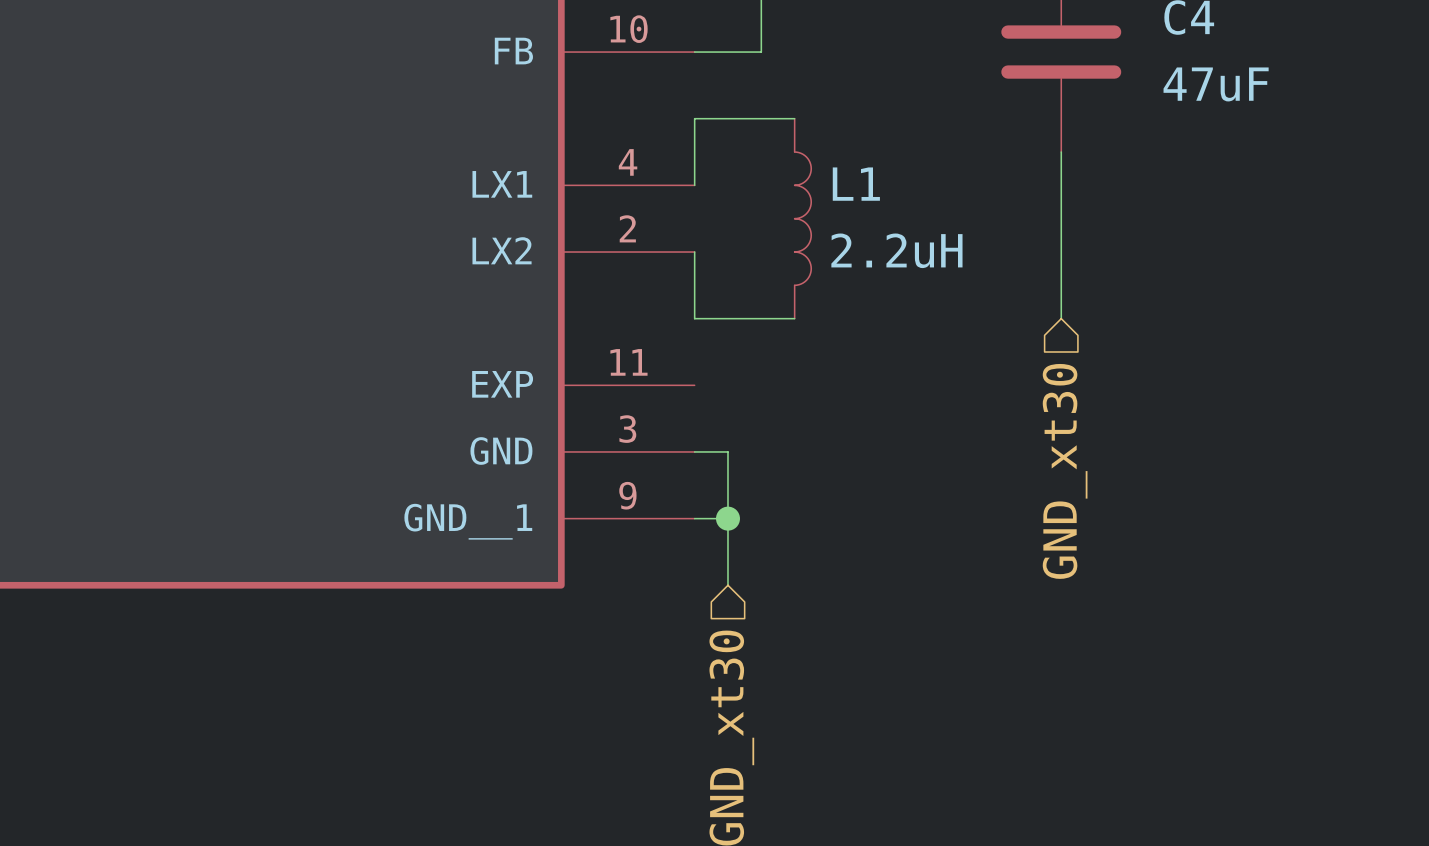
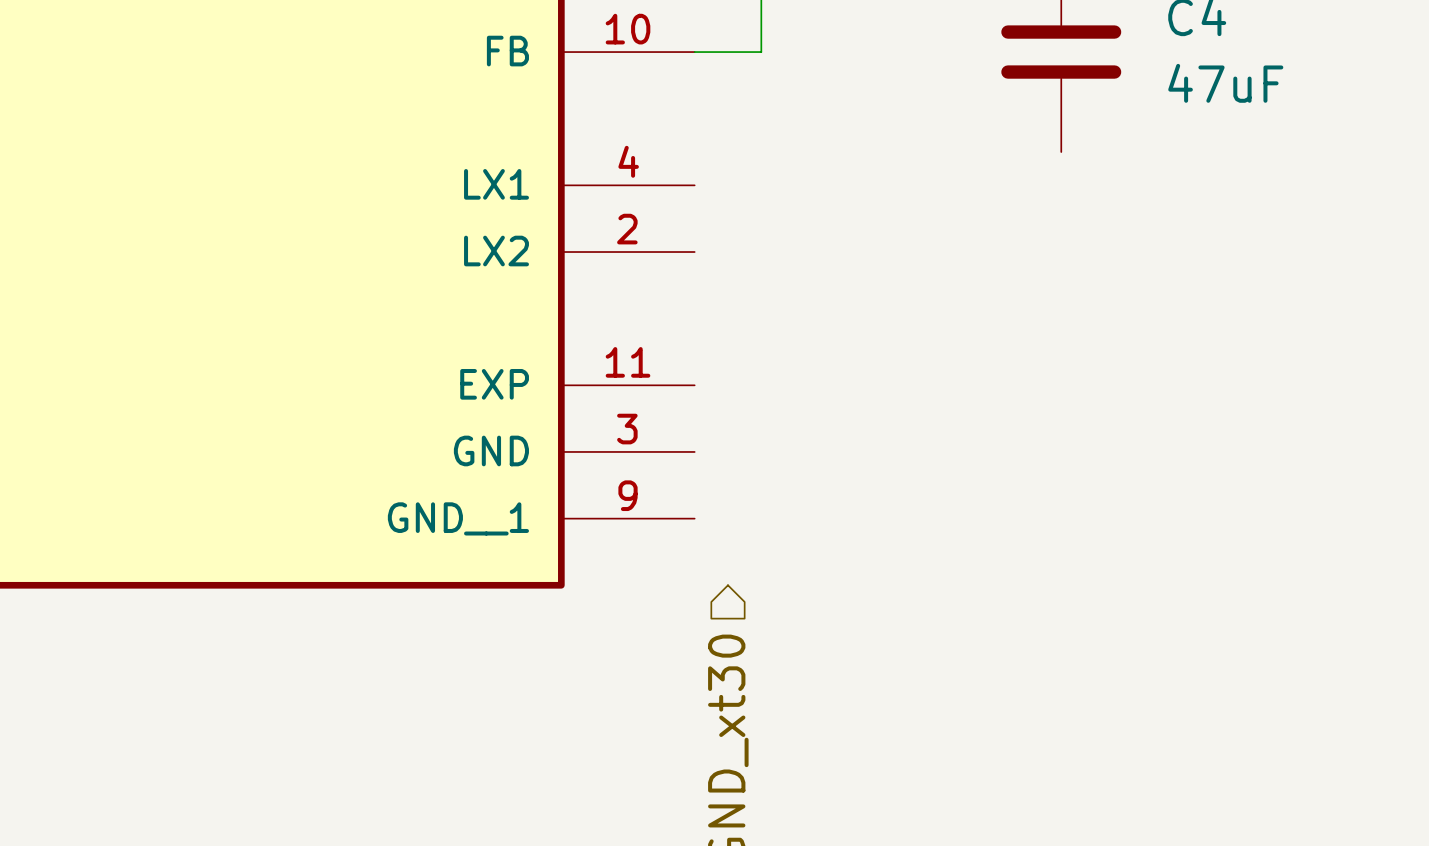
wire: (794, 118) (694, 118) (694, 185) -> none
wire: (1061, 152) (1061, 318) -> none
L1: 2.2uH (802, 218) -> none
wire: (694, 252) (694, 318) (794, 318) -> none
wire: (694, 451) (727, 451) (727, 585) -> none
hierarchical label: GND_xt30 (1065, 471) -> none
wire: (694, 518) (727, 518) -> none
junction: (727, 518) -> none

